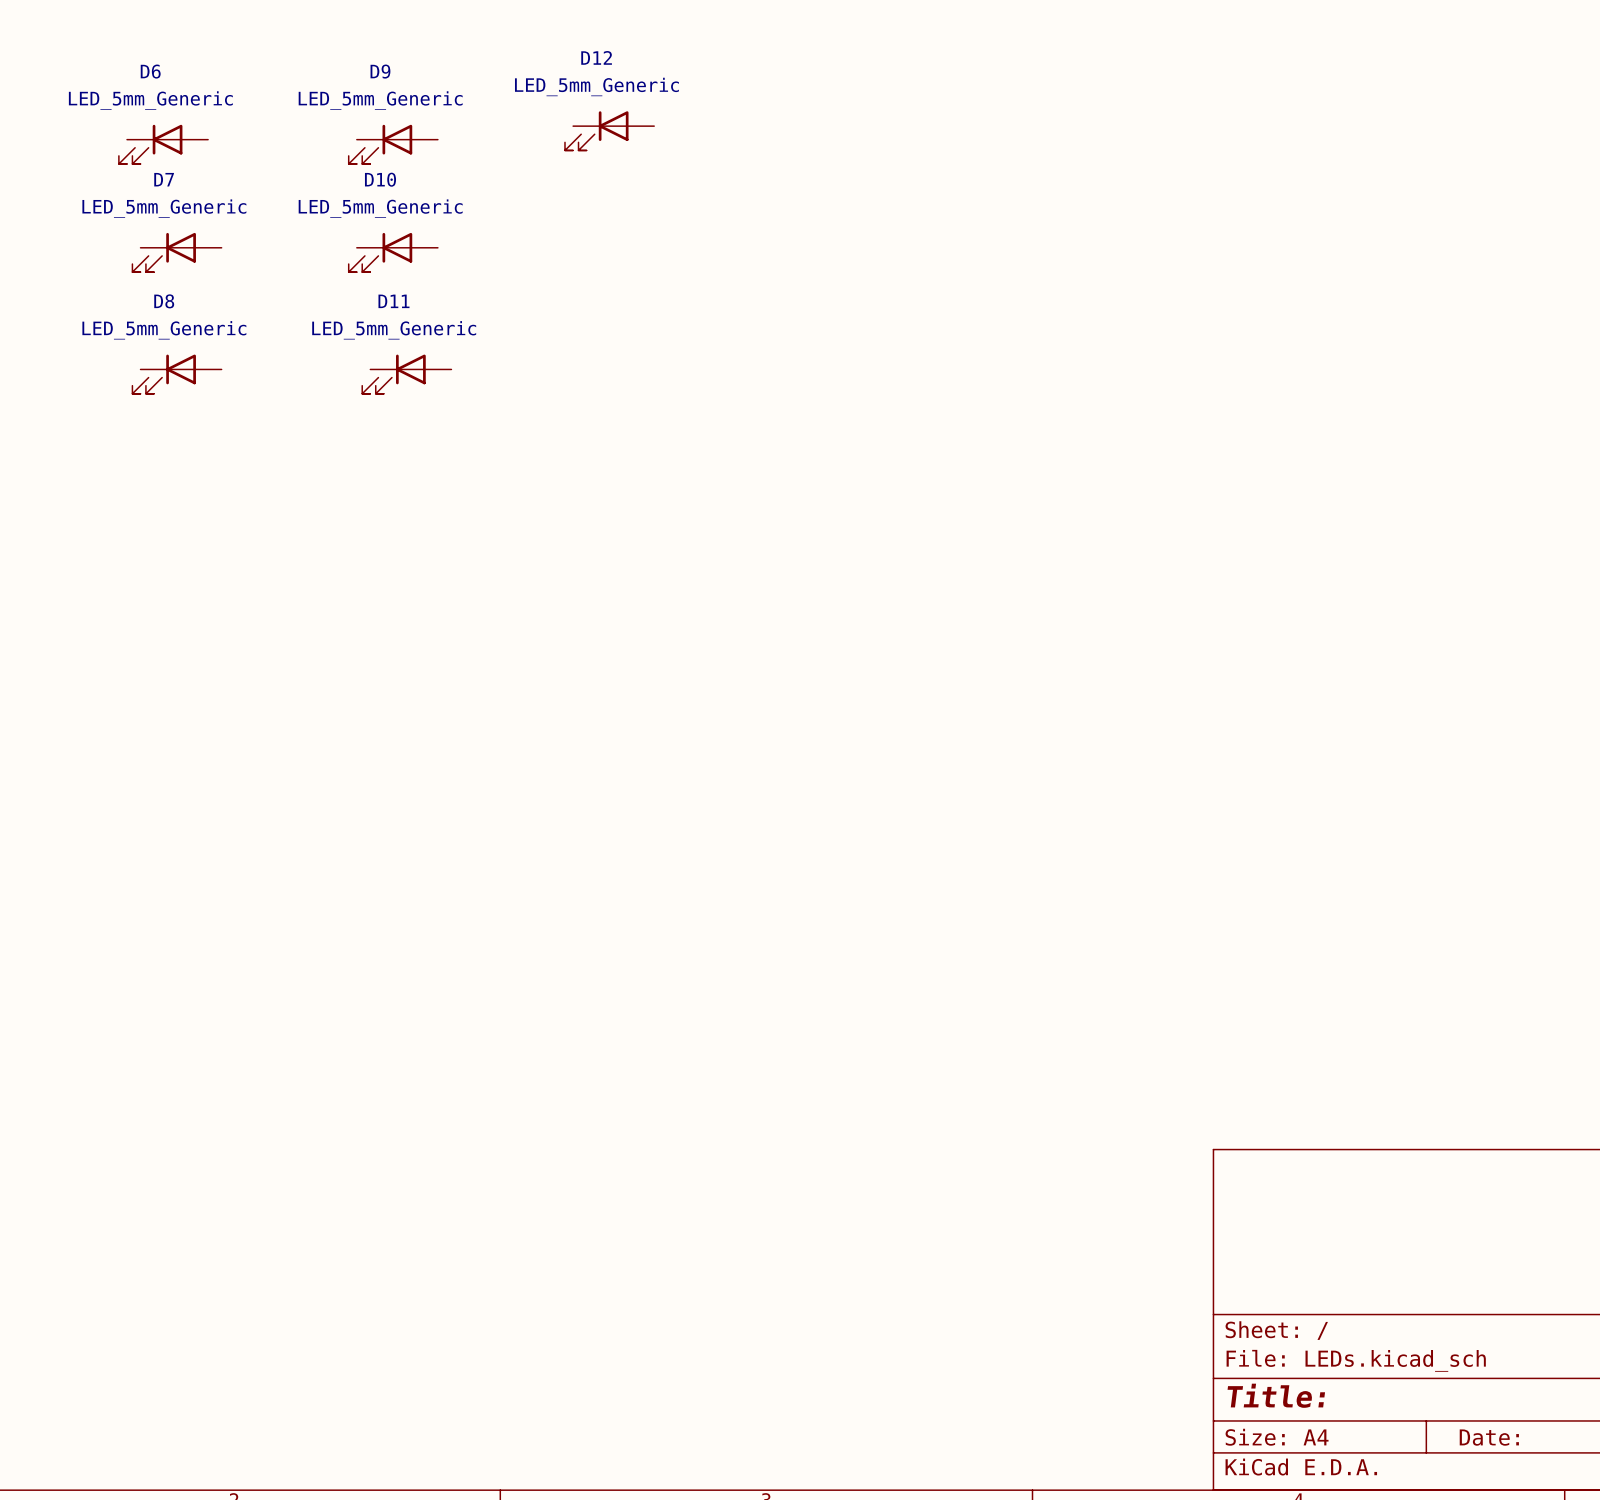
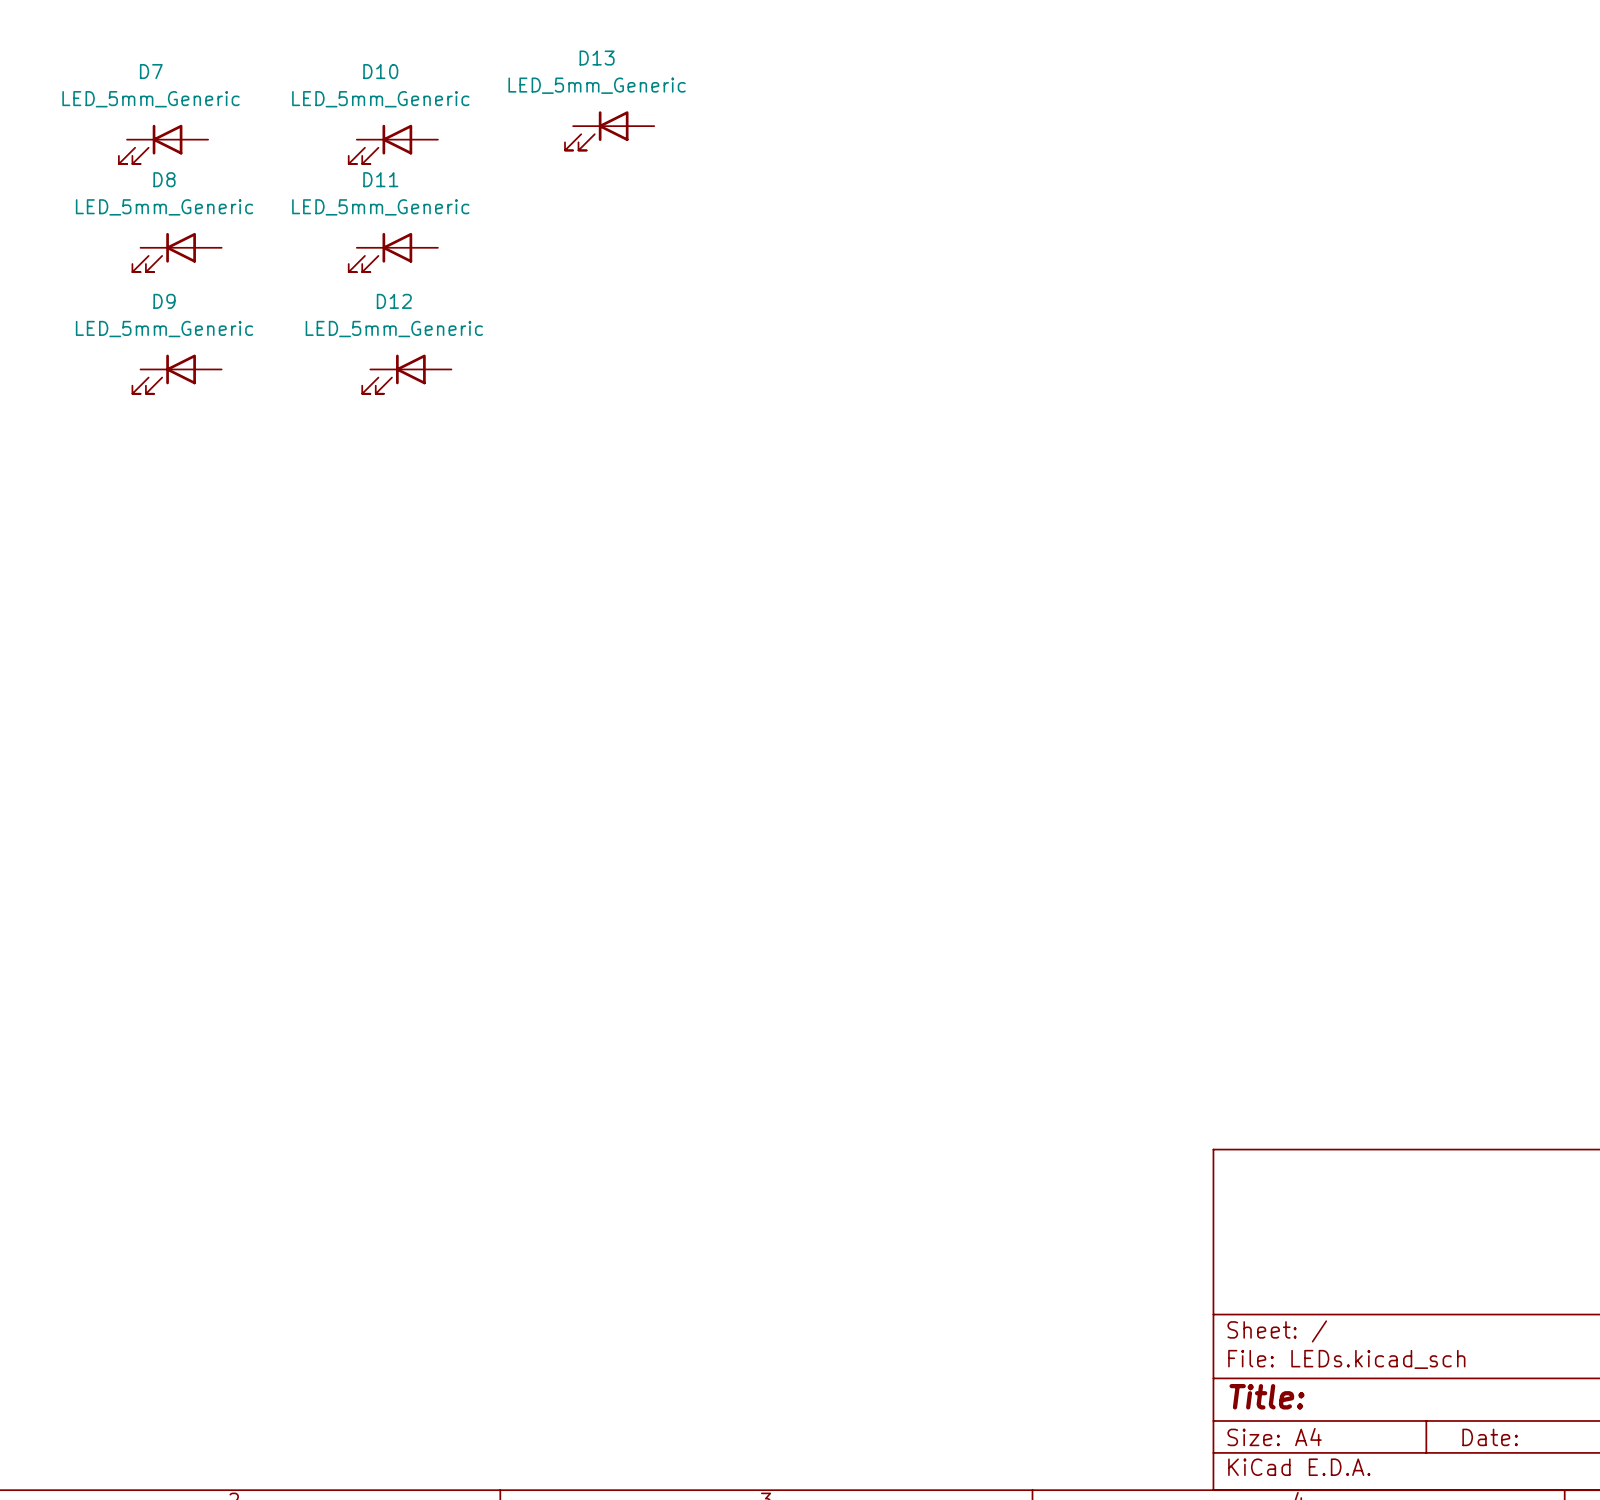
D12 name: D12 (596, 57) -> D13 (597, 58)
D6 name: D6 (150, 71) -> D7 (151, 71)
D9 name: D9 (380, 71) -> D10 (380, 71)
D7 name: D7 (164, 179) -> D8 (164, 179)
D10 name: D10 (380, 179) -> D11 (380, 179)
D8 name: D8 (164, 301) -> D9 (164, 301)
D11 name: D11 (393, 301) -> D12 (394, 301)

